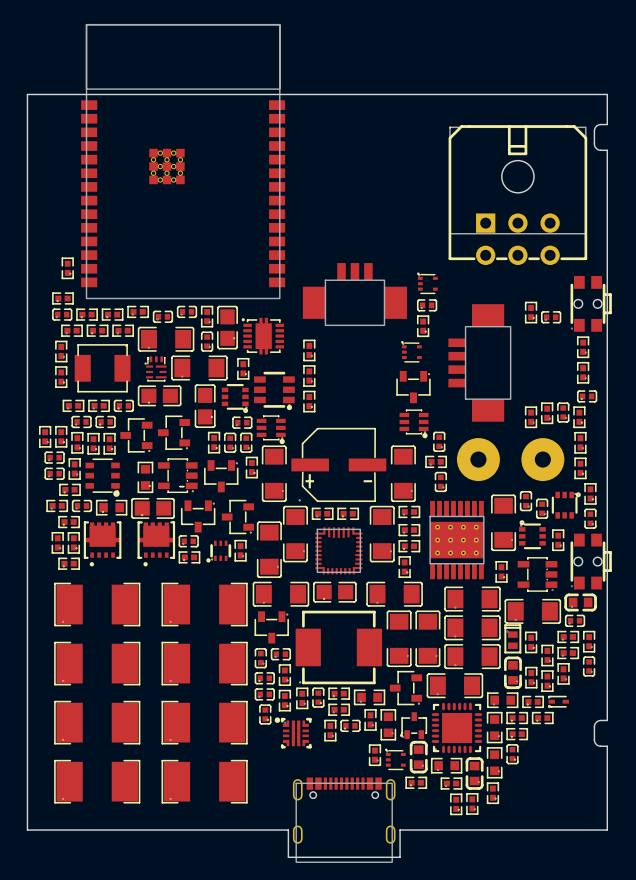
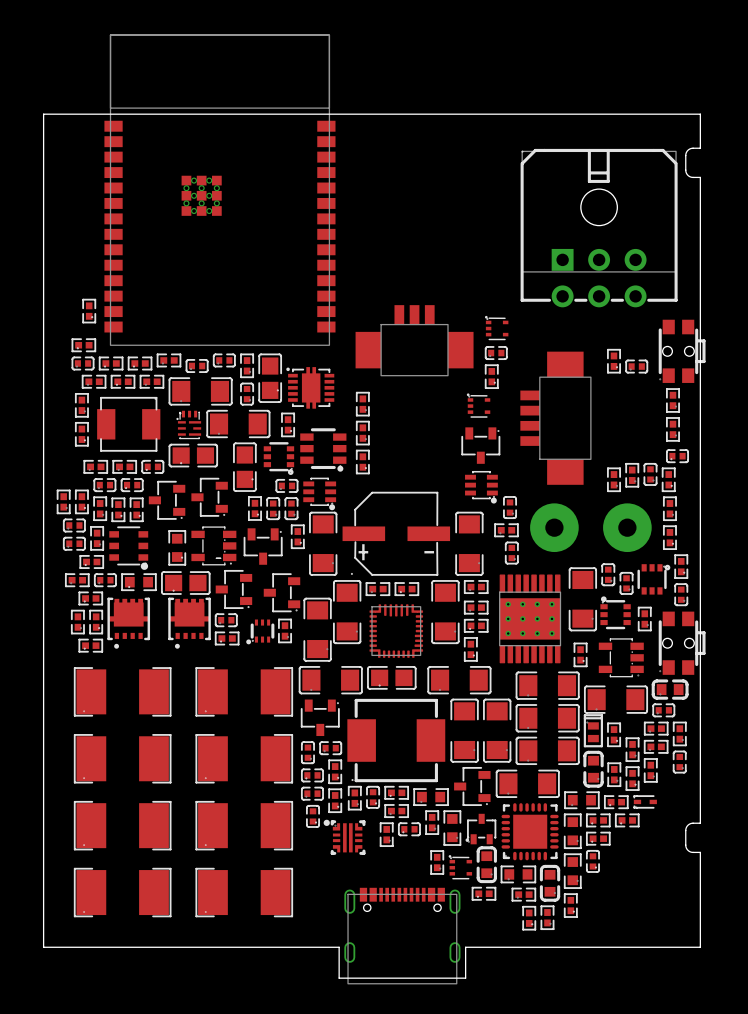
part rotation: 0° (198, 516) -> 90° clockwise (233, 589)

